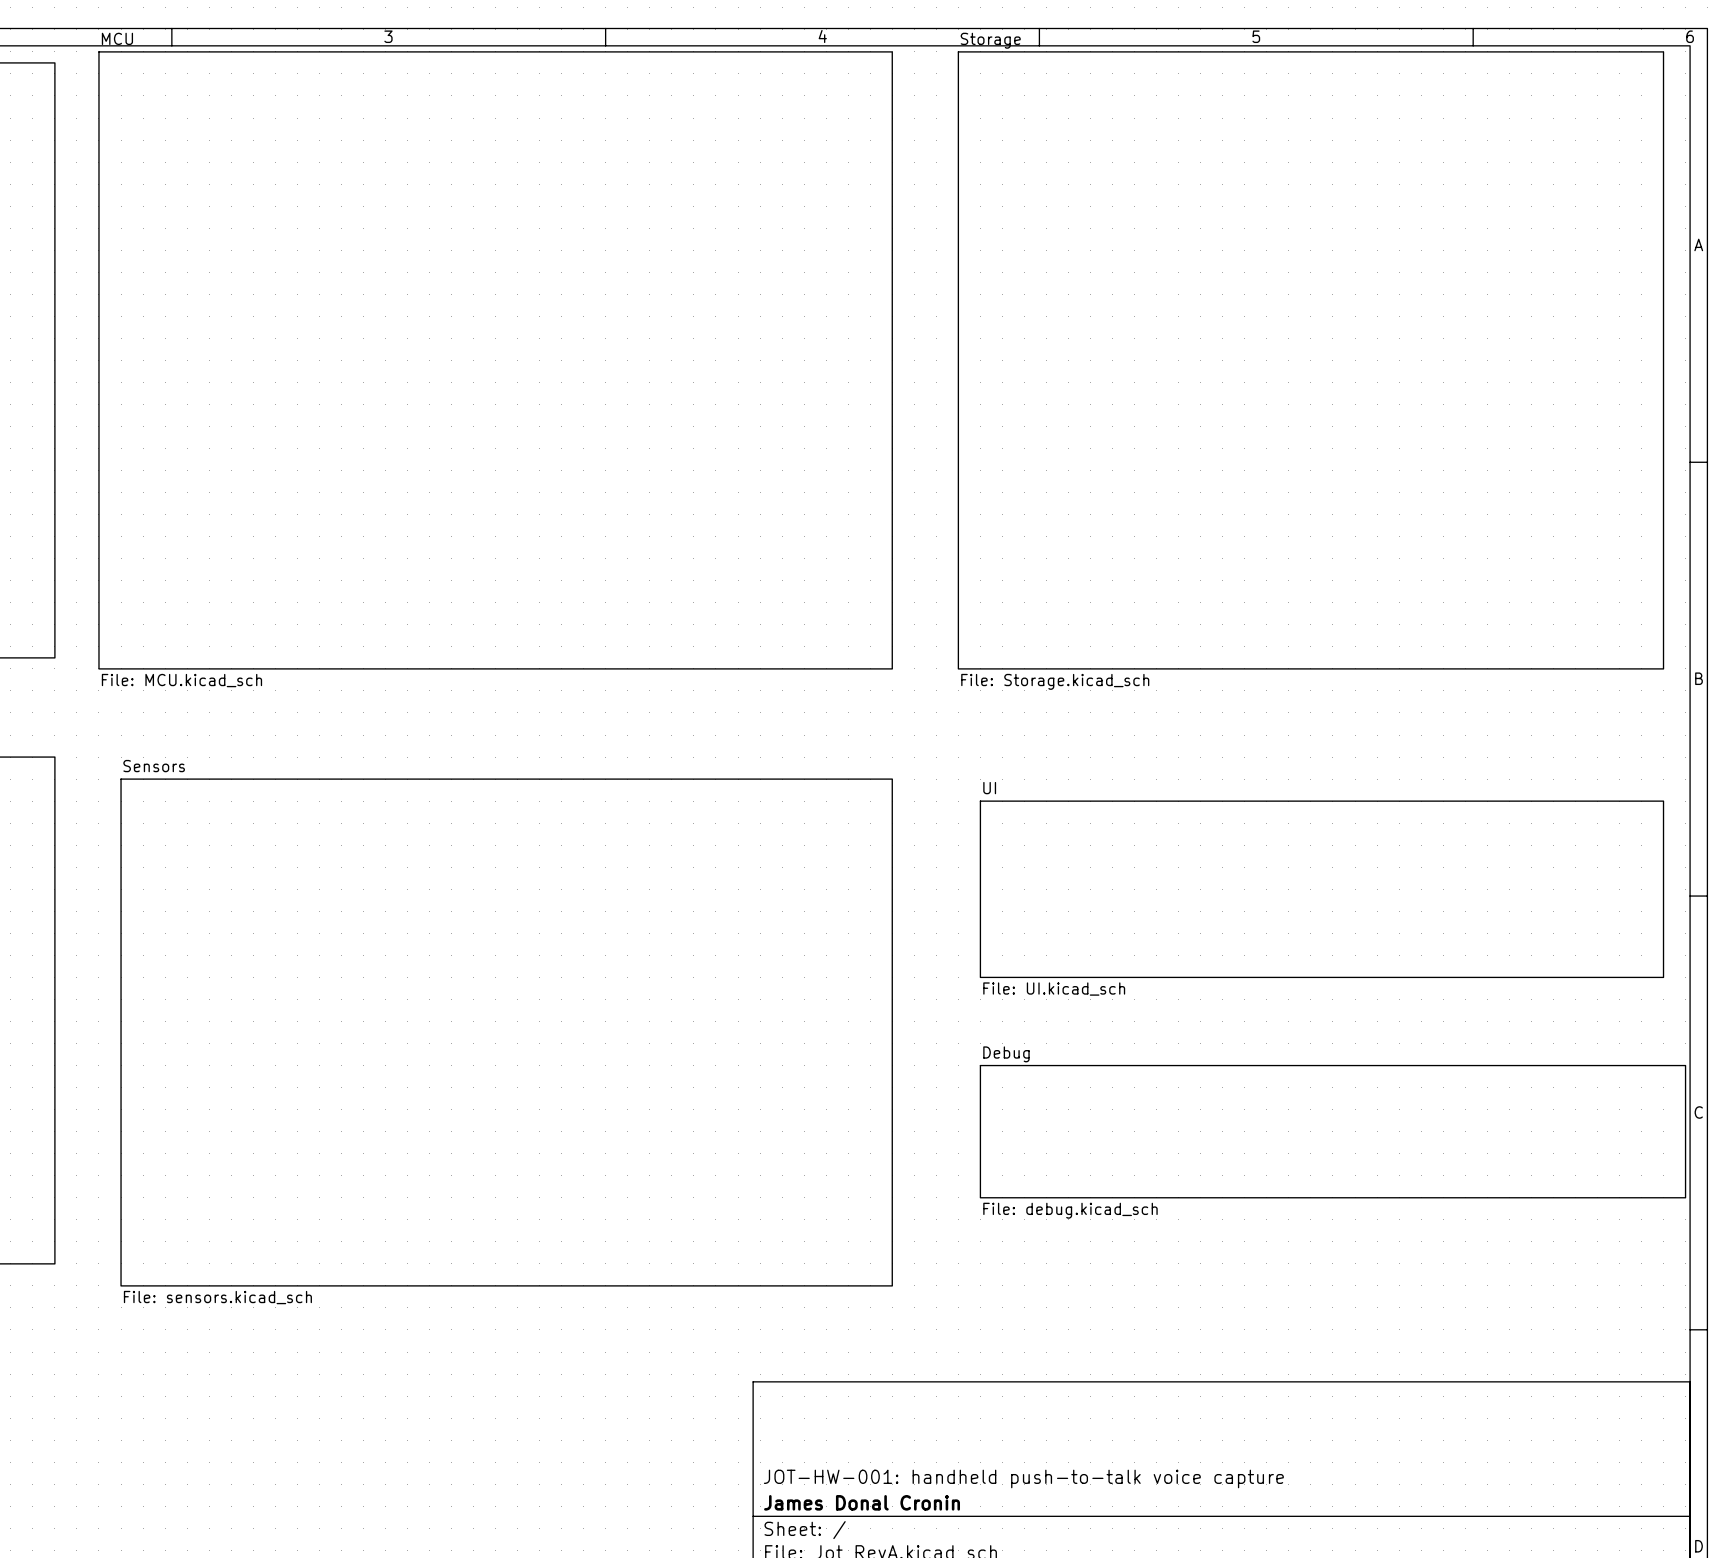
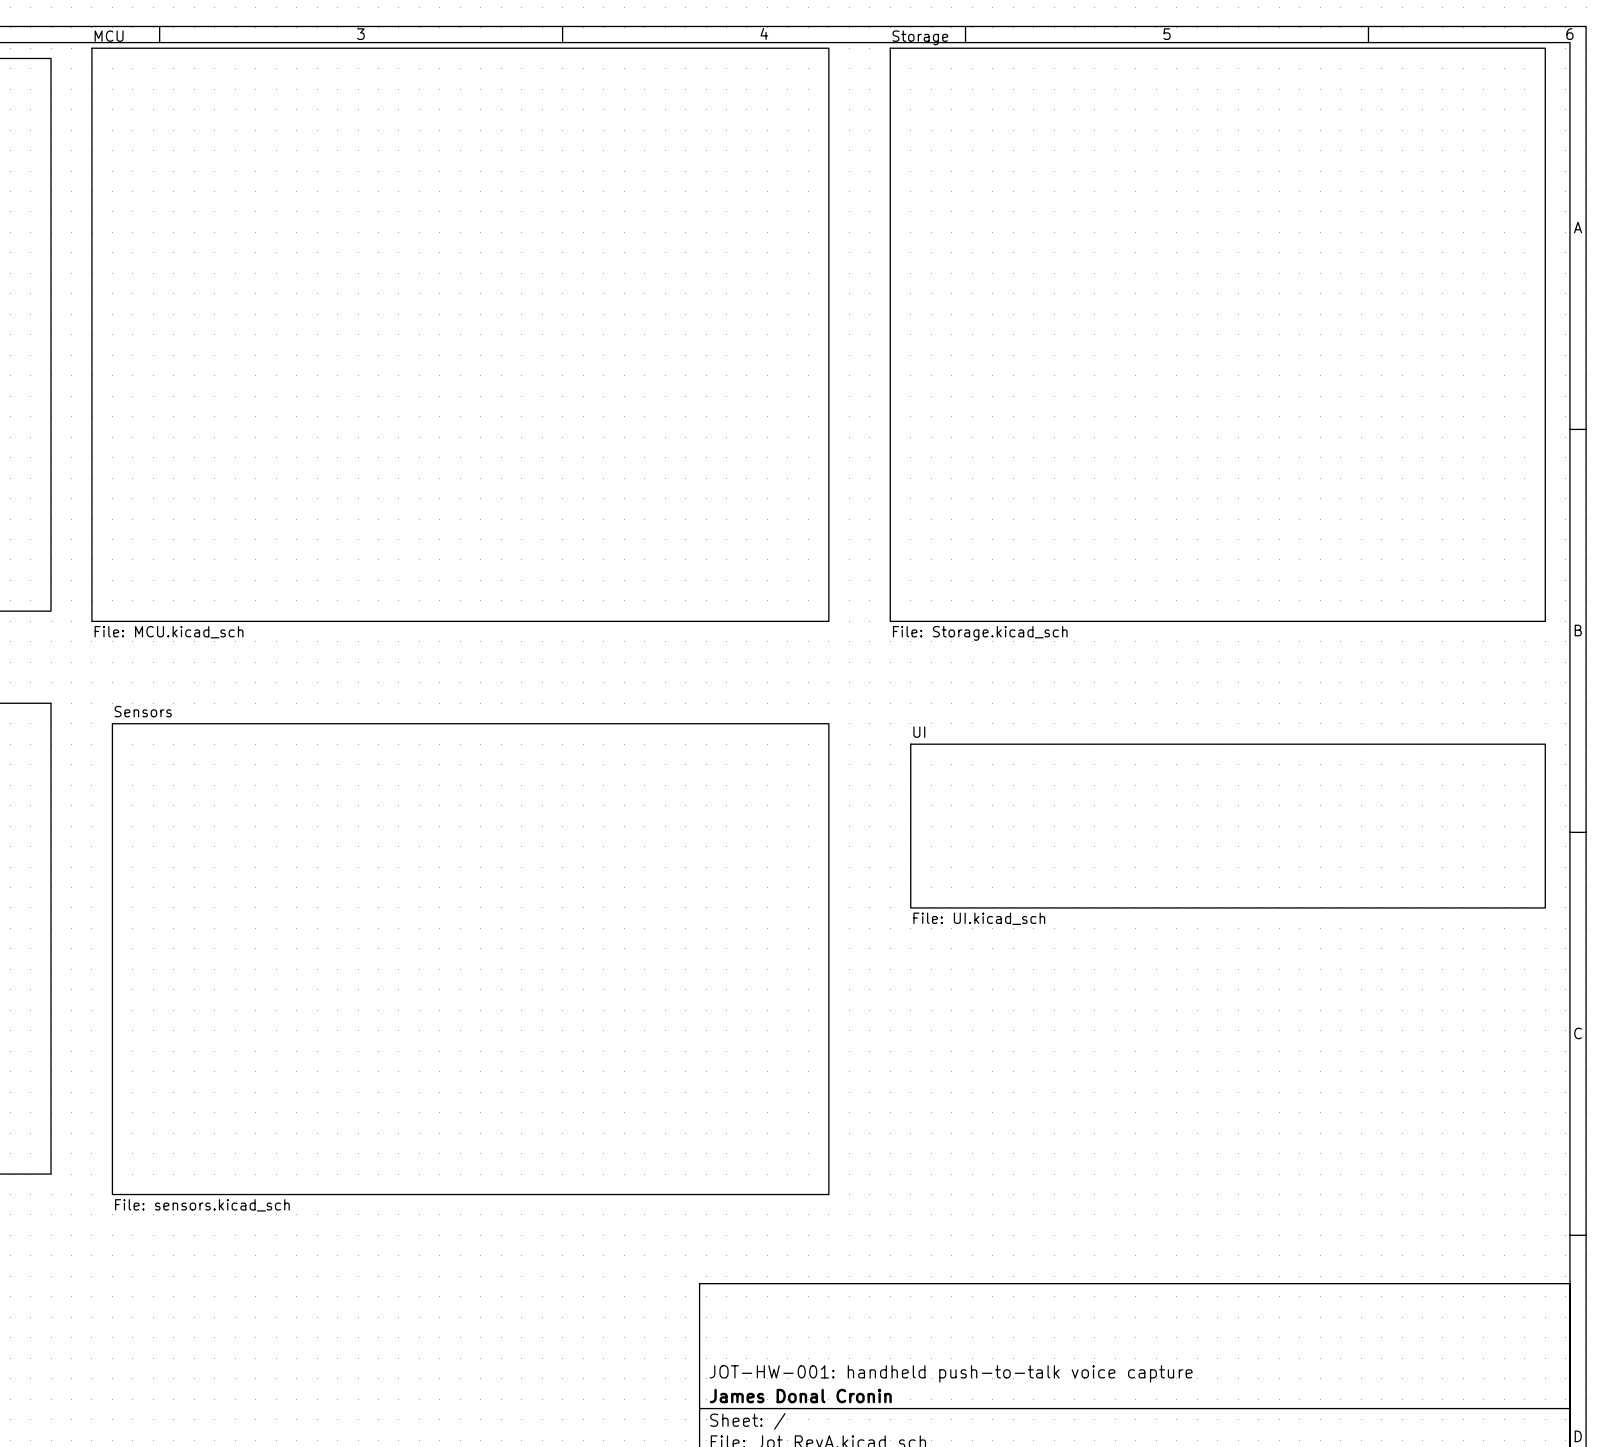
sheet Debug: File: debug.kicad_sch (1332, 1131) -> none

